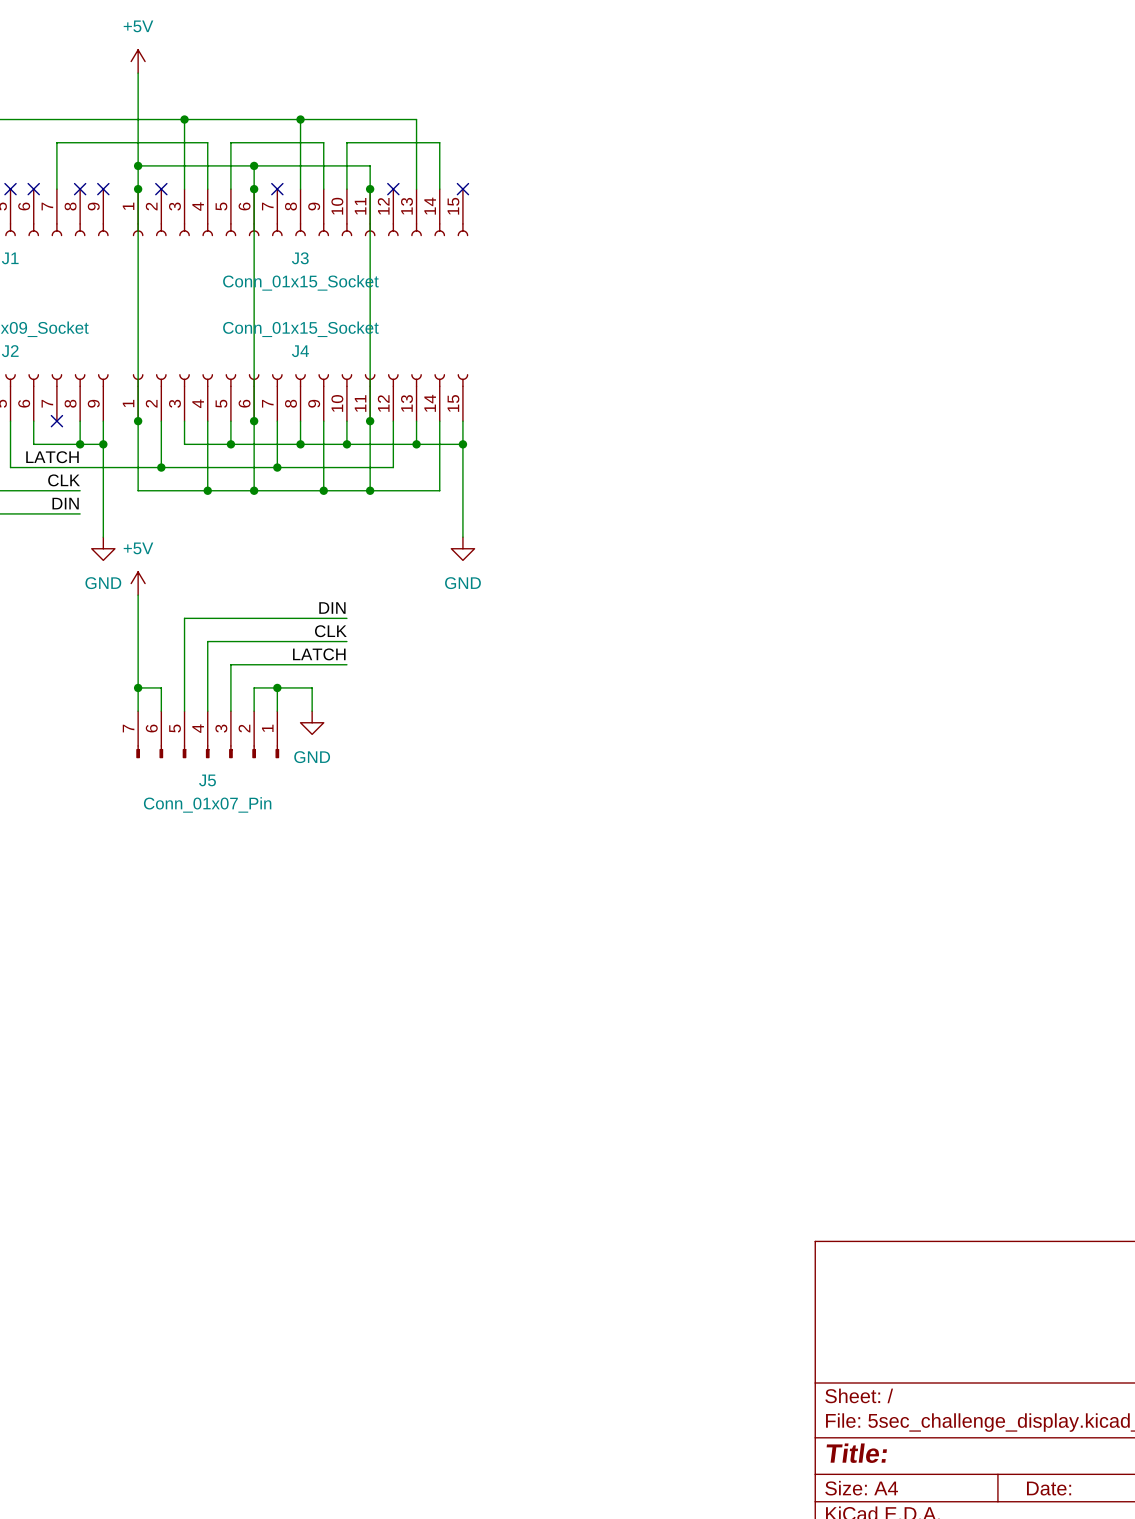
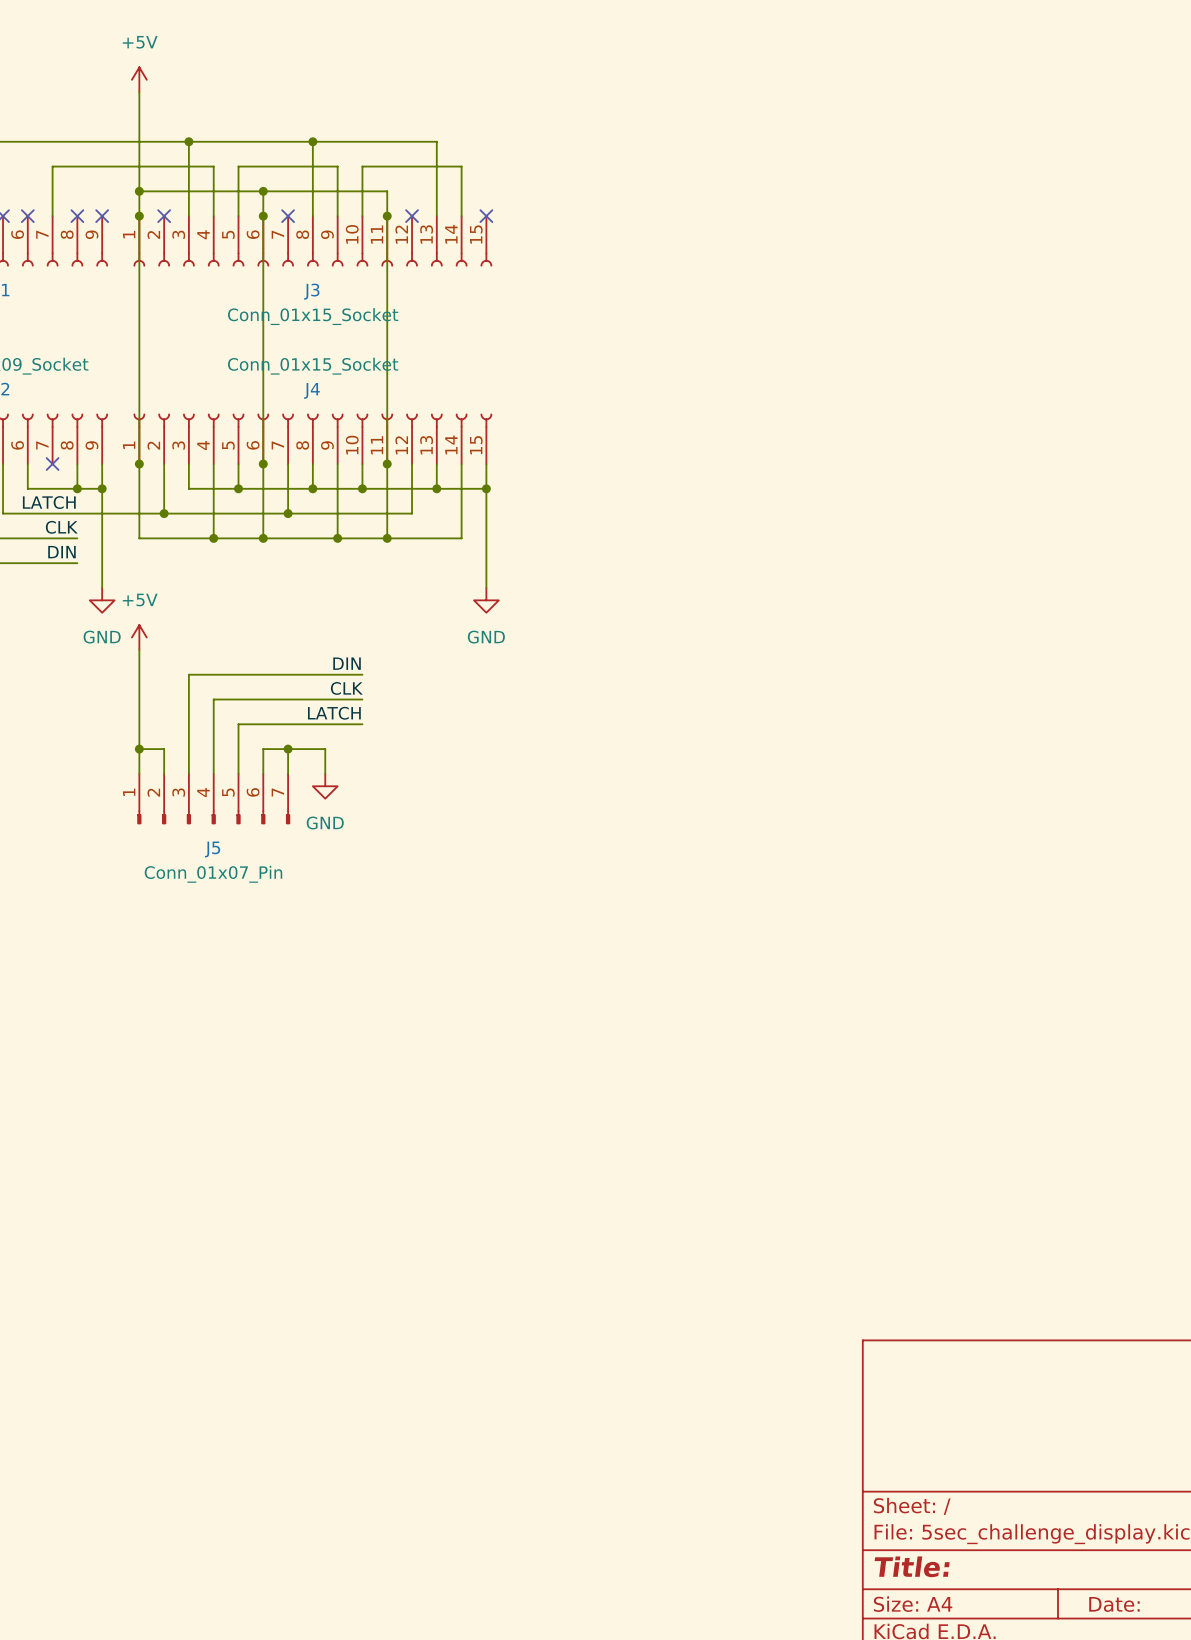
J5 flip: as is (207, 751) -> left-right (213, 817)

